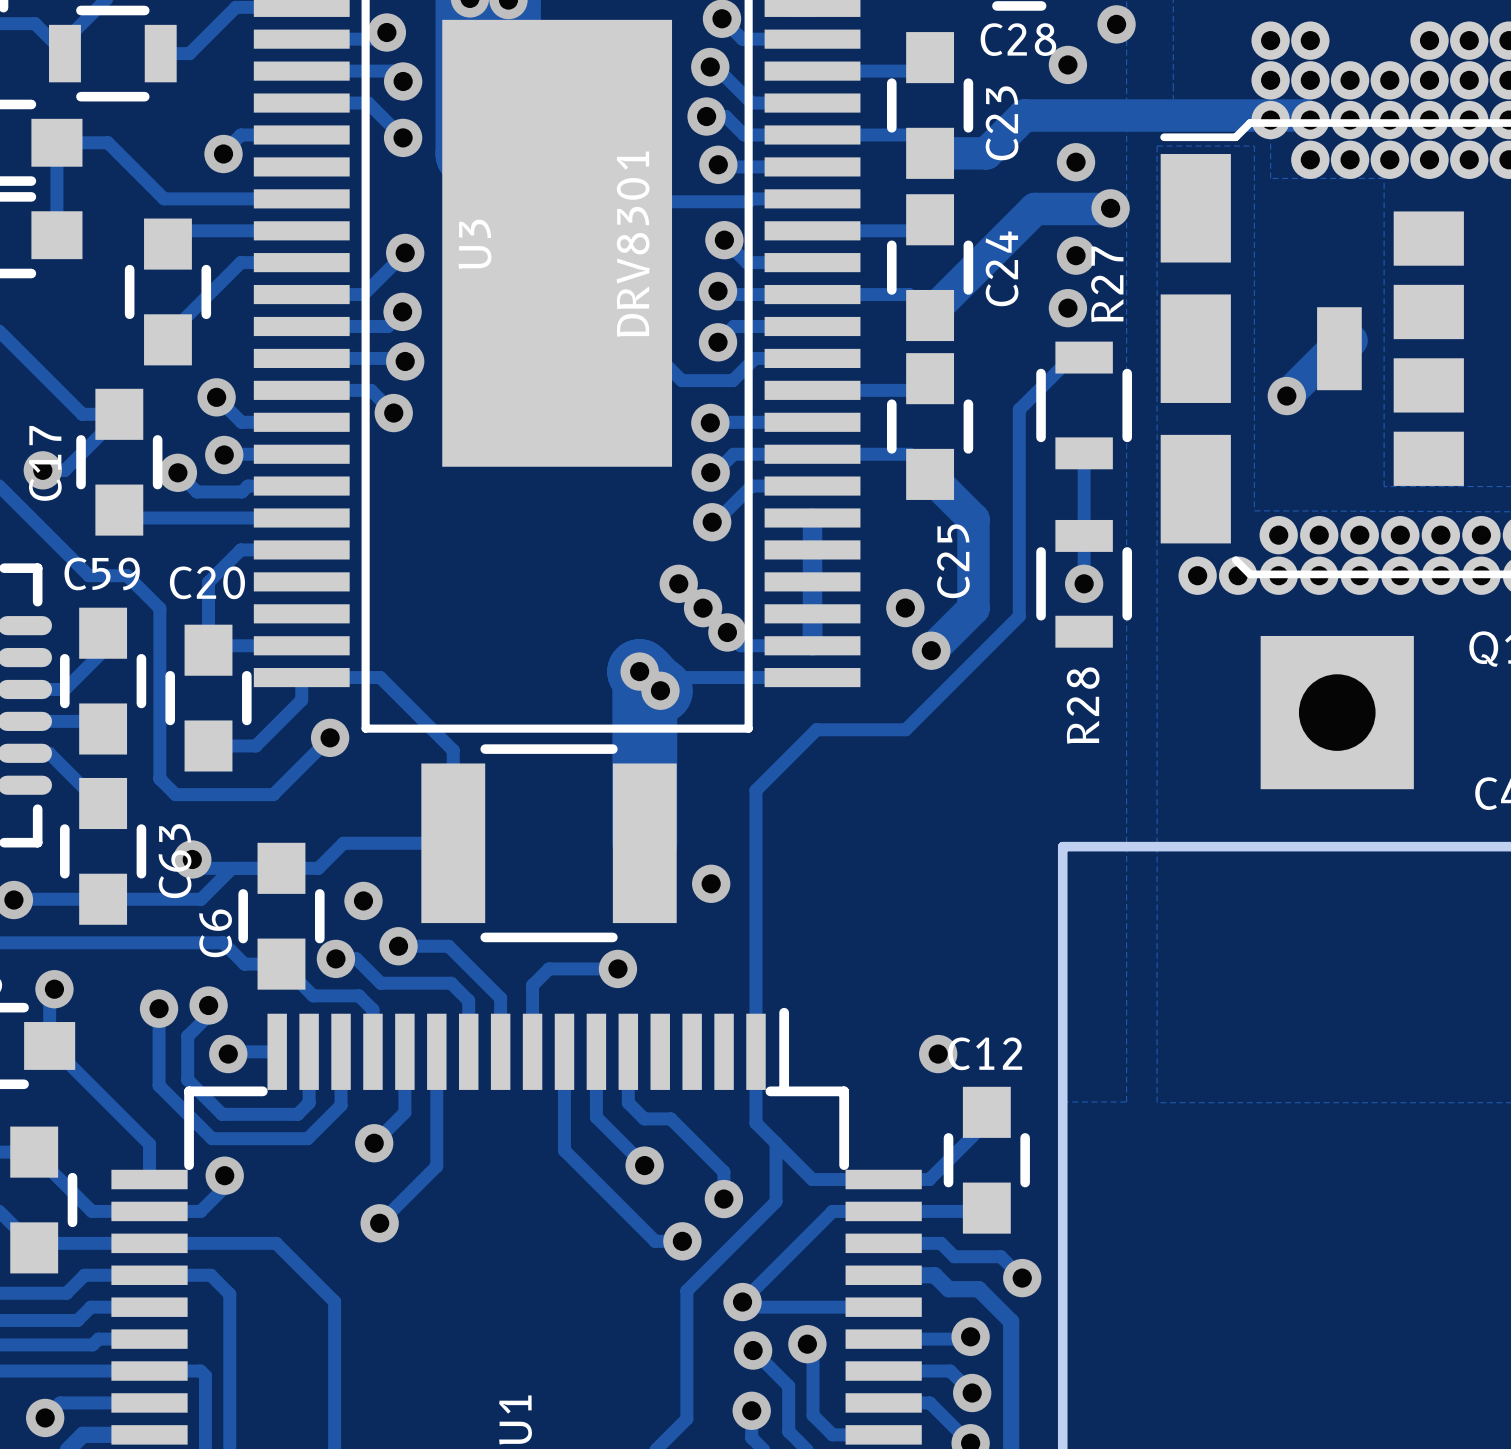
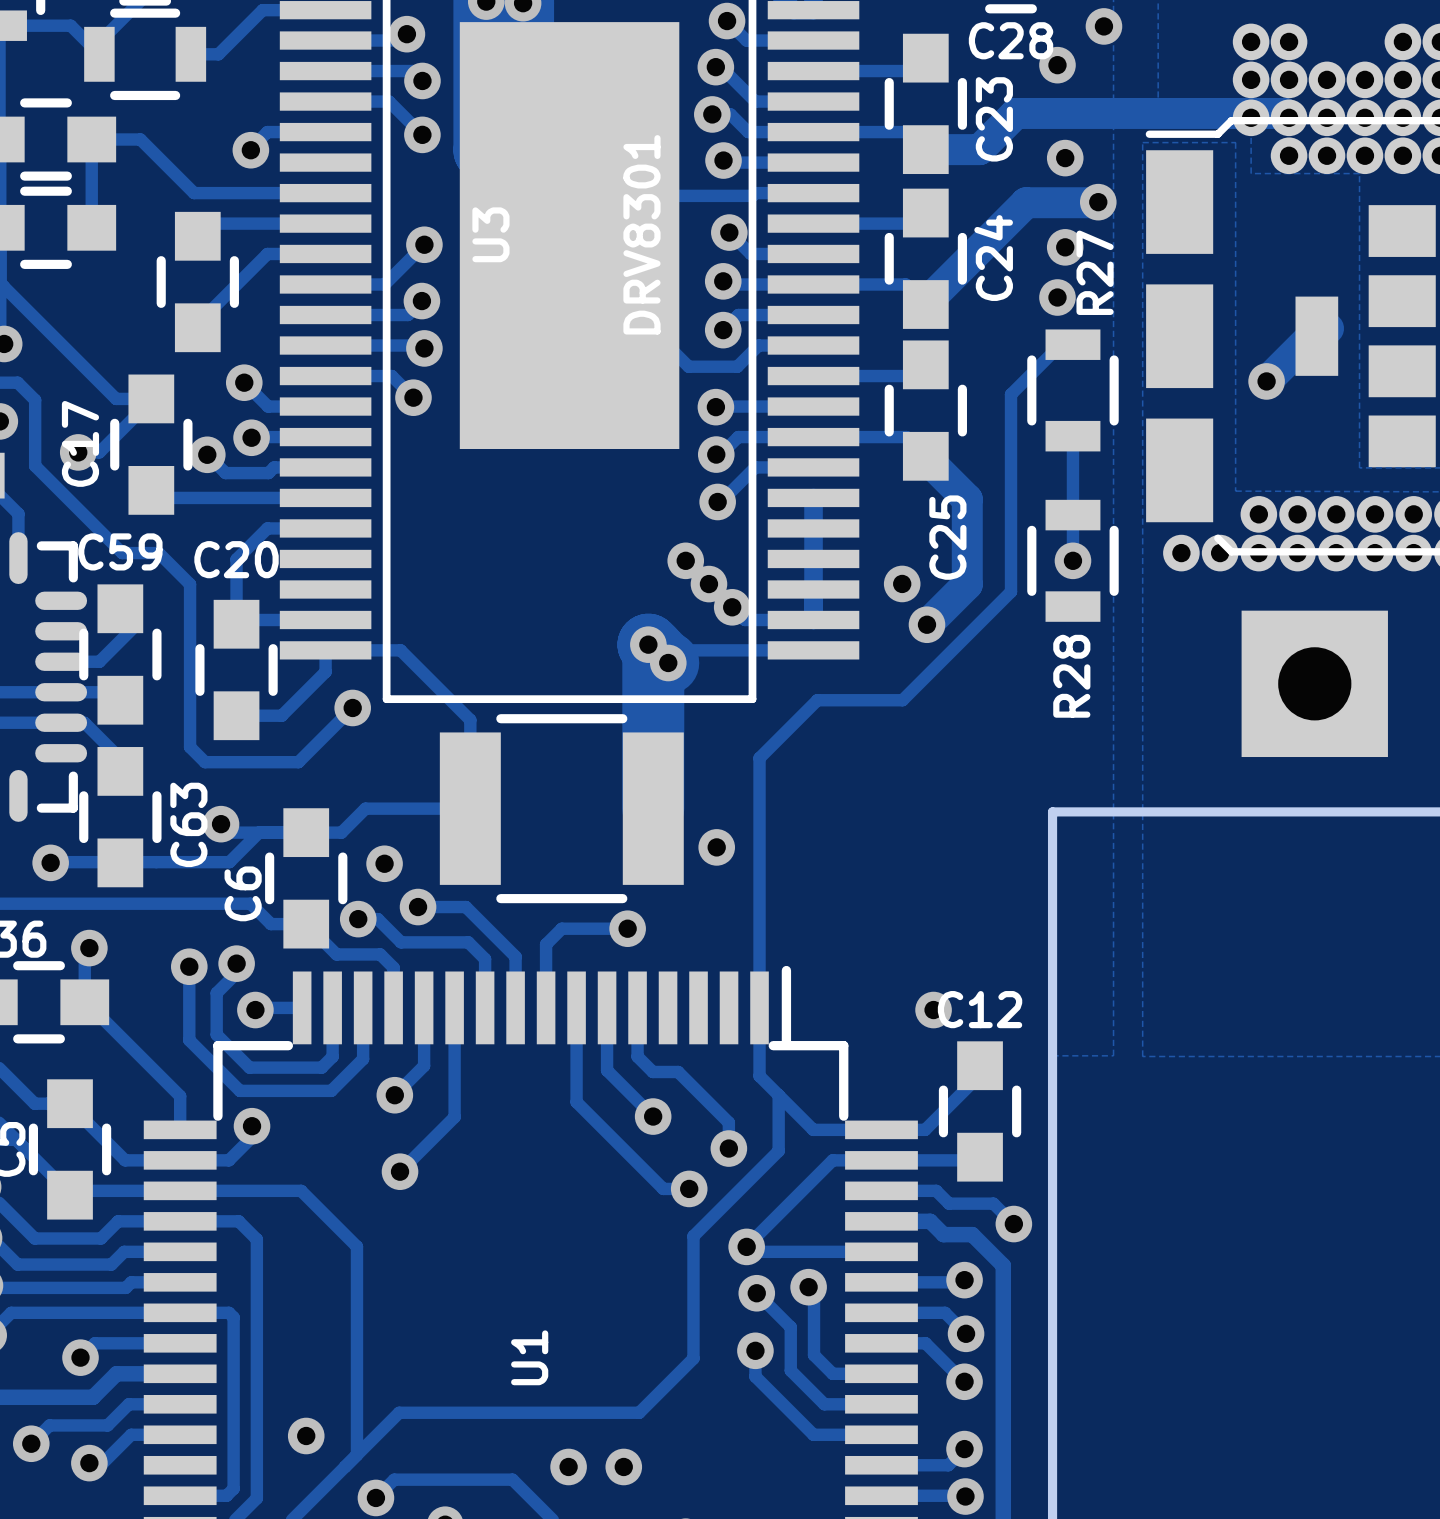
C59 position: (103, 681) -> (120, 654)
C63 position: (103, 851) -> (120, 817)

